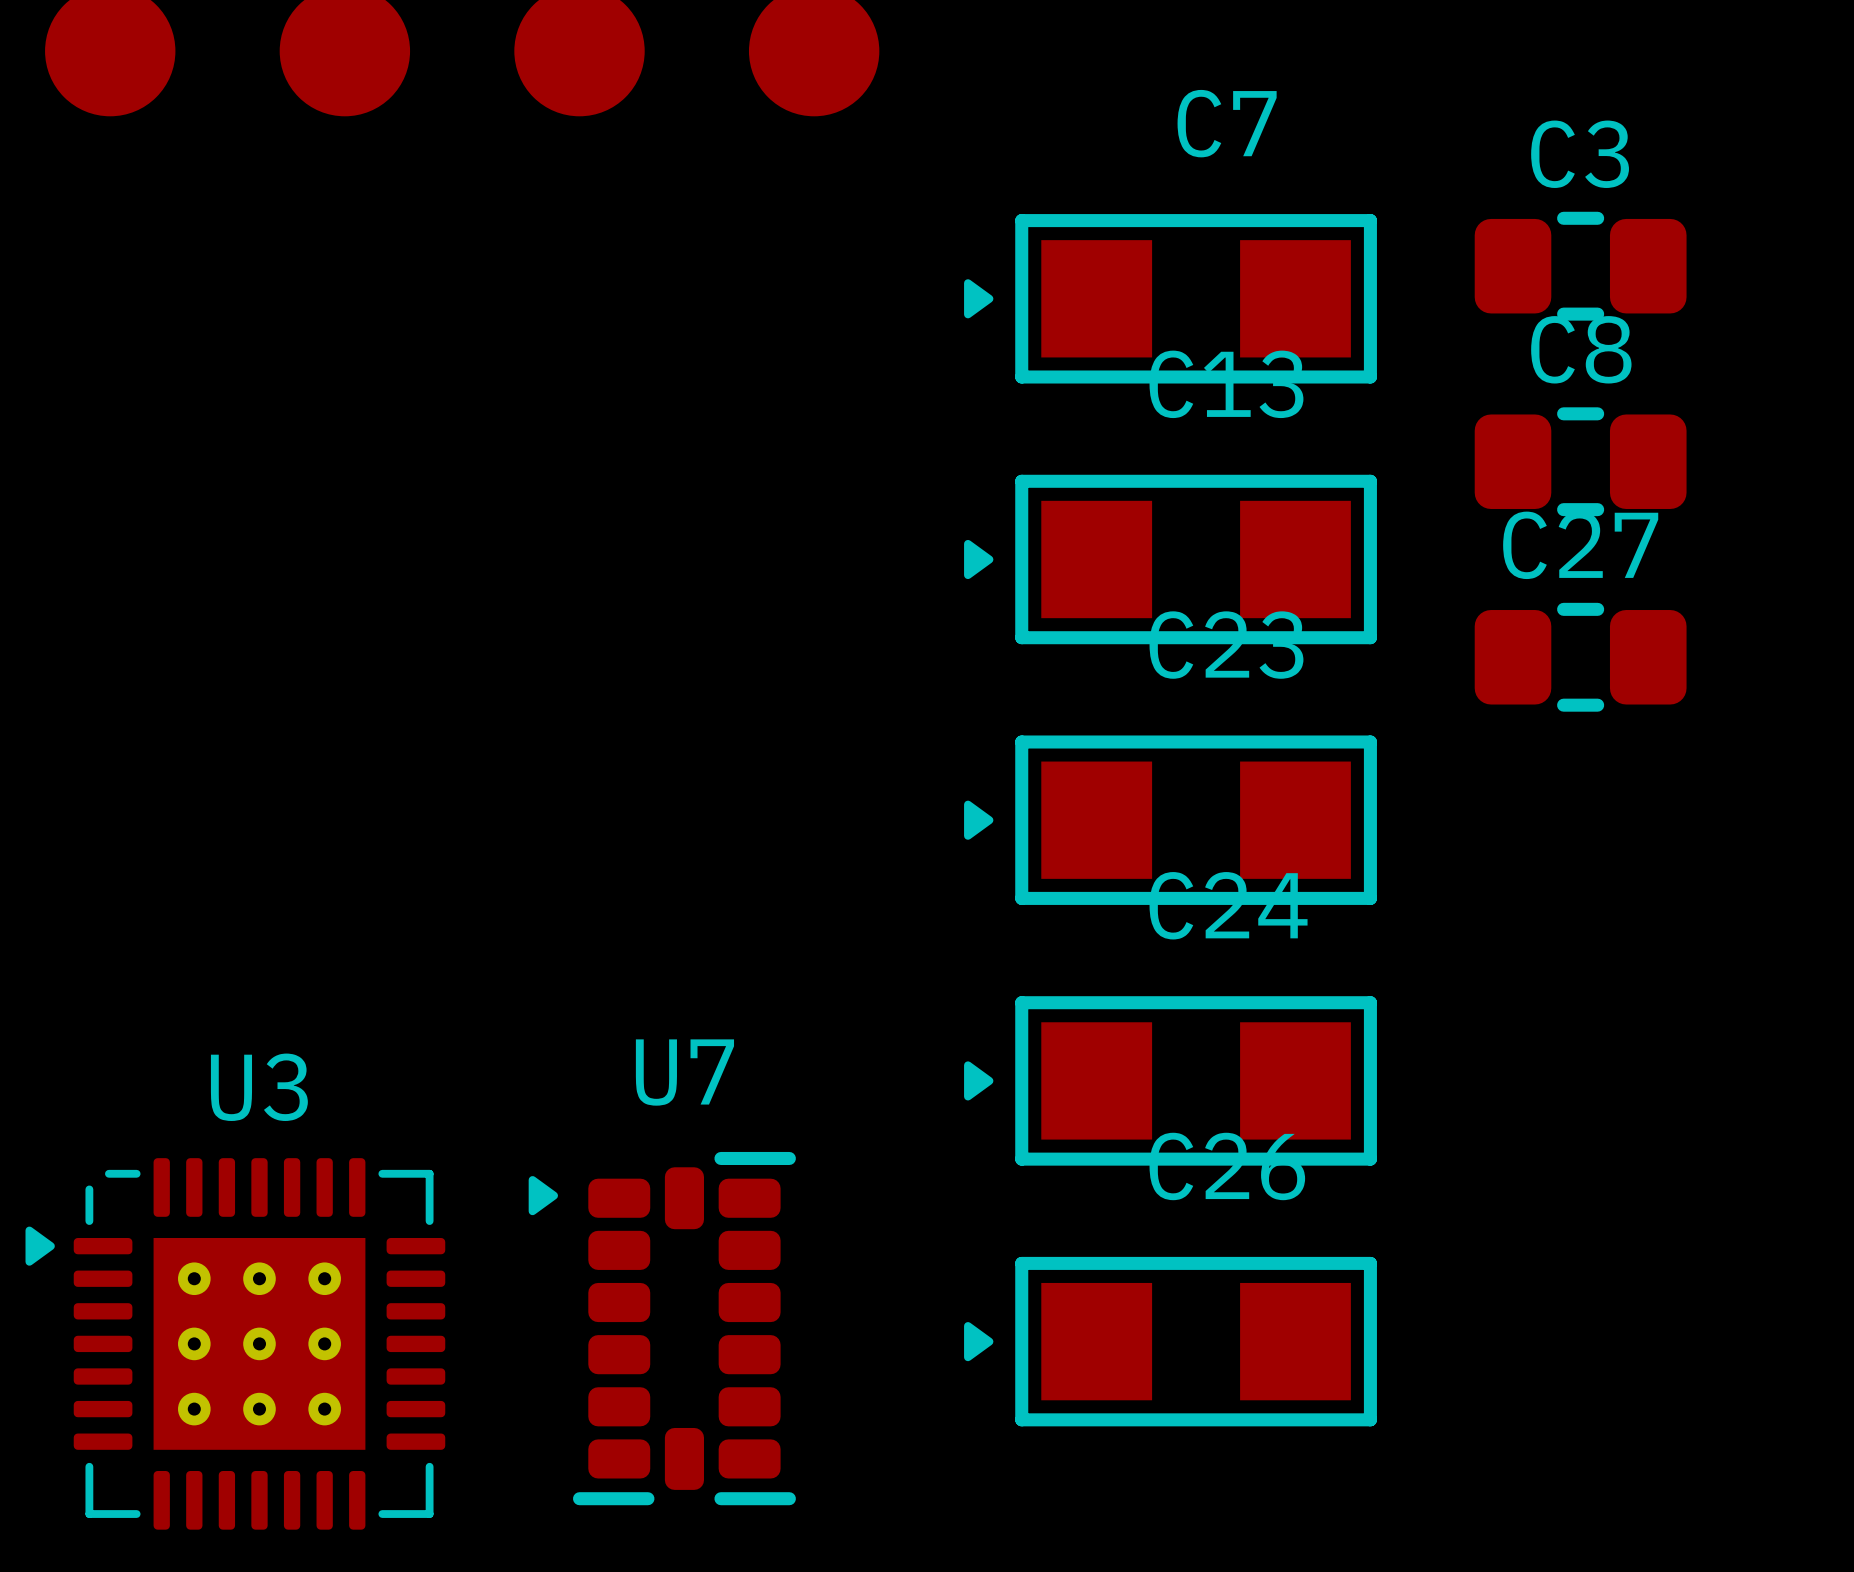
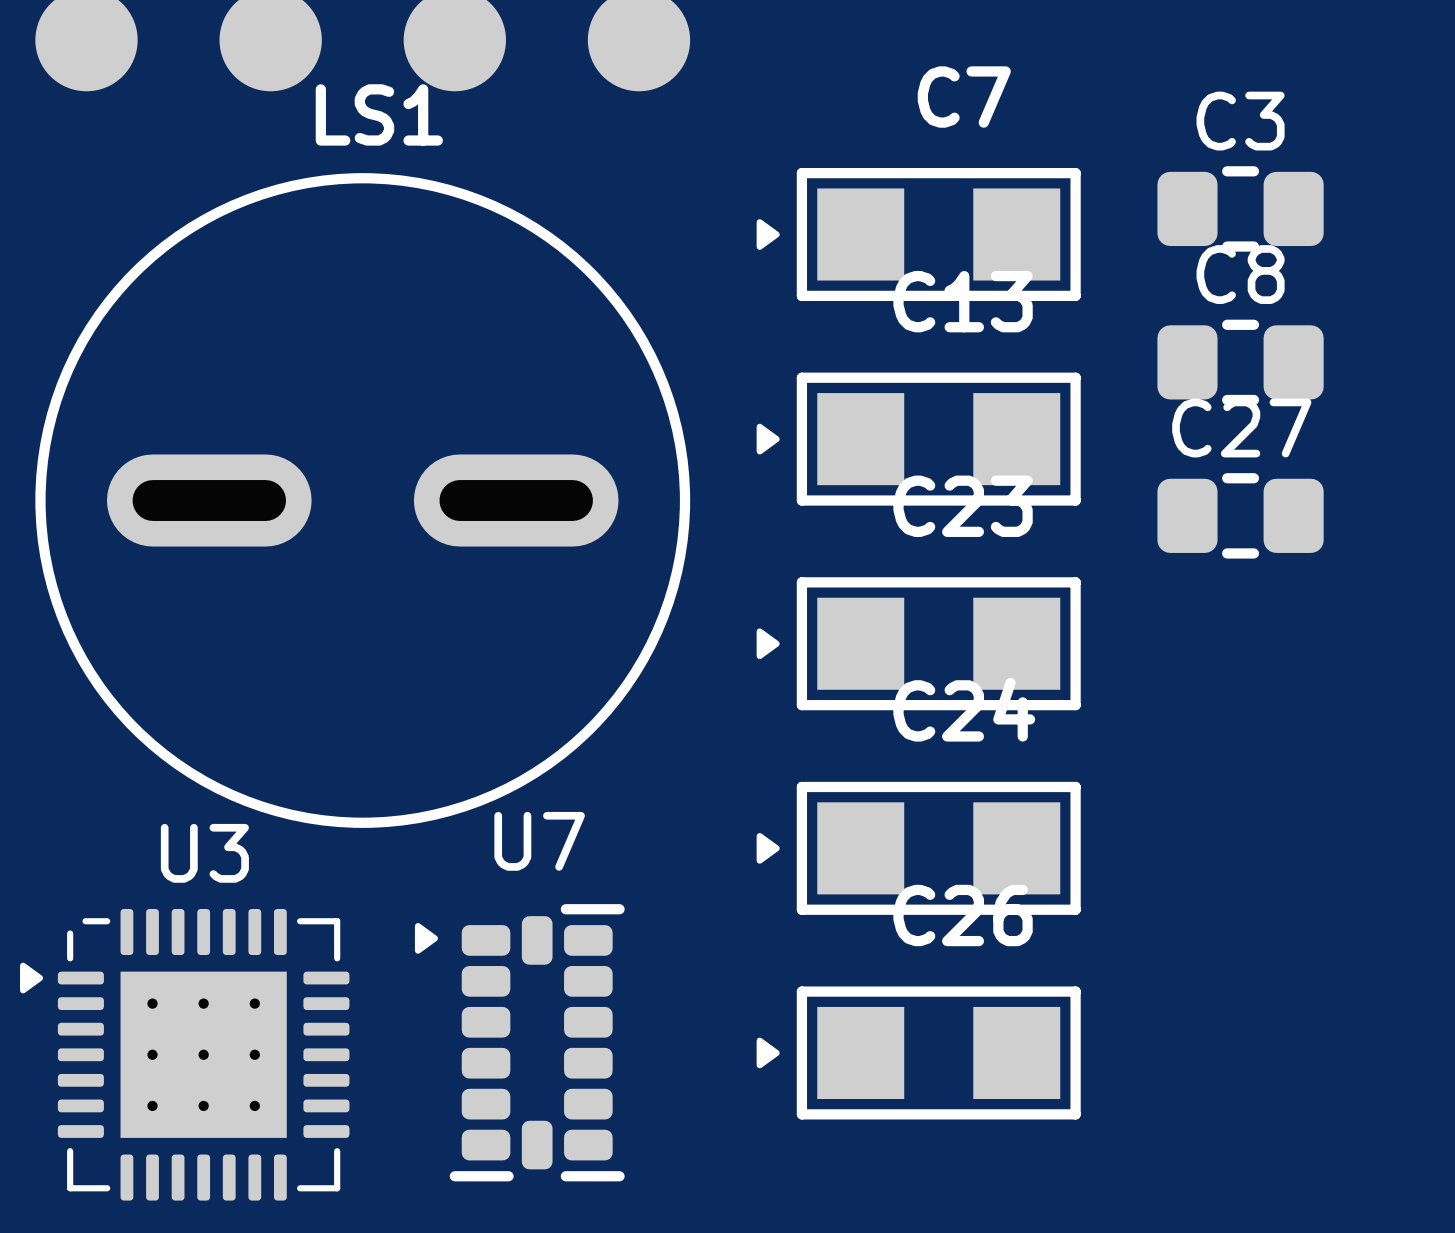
LS1: none -> (362, 500)

